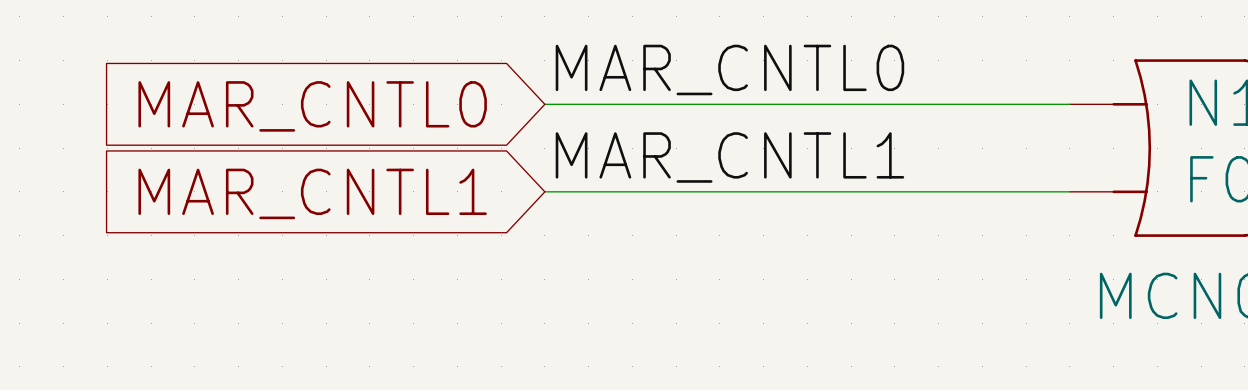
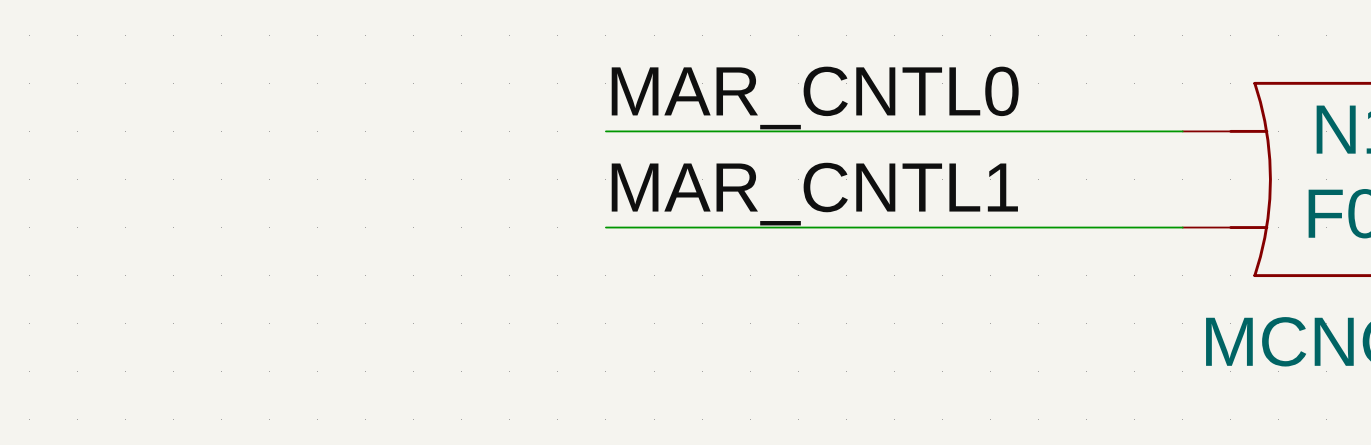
global label: MAR_CNTL0 (312, 106) -> none
global label: MAR_CNTL1 (312, 193) -> none

